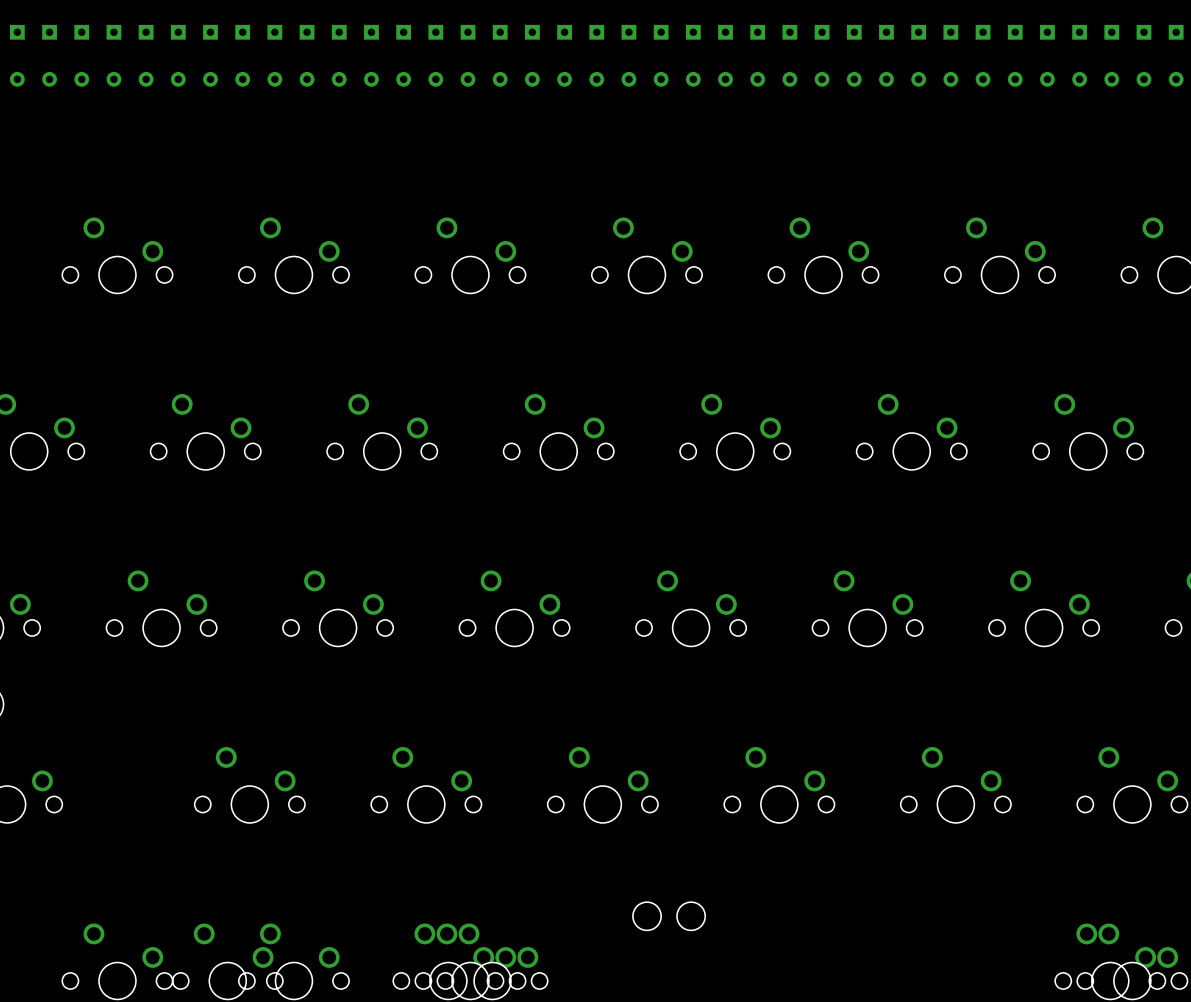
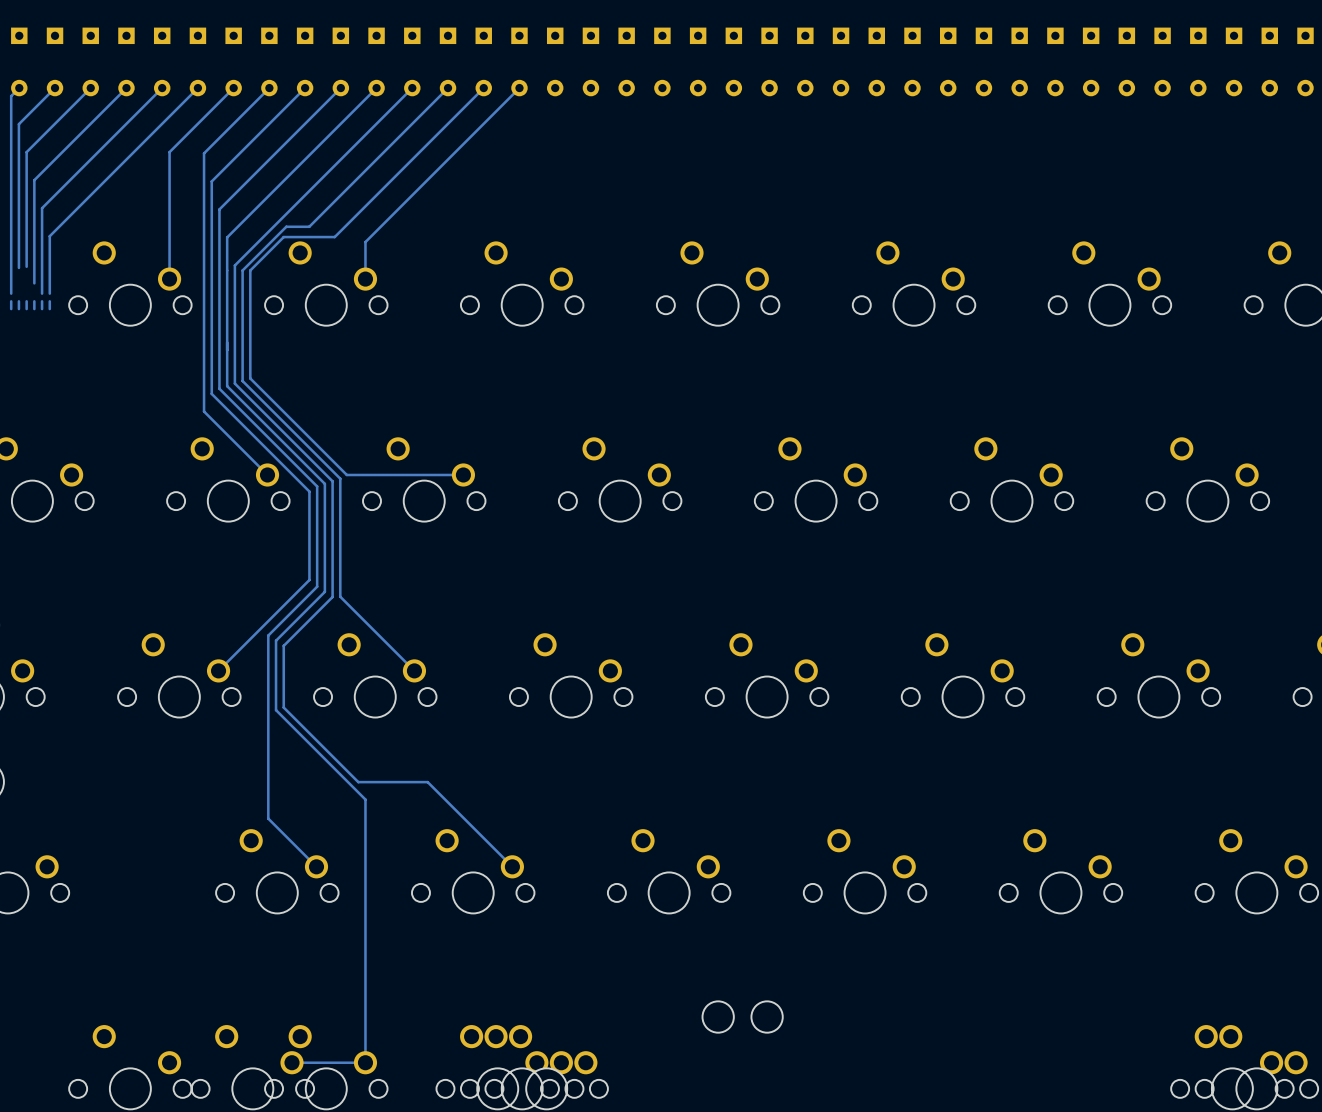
track: none -> (19, 88) (11, 96) (11, 293)
track: none -> (55, 88) (18, 124) (18, 267)
track: none -> (90, 88) (26, 152) (26, 266)
track: none -> (126, 88) (34, 180) (34, 283)
track: none -> (162, 88) (42, 208) (42, 293)
track: none -> (197, 88) (49, 236) (49, 293)
track: none -> (233, 88) (169, 152) (169, 279)
track: none -> (269, 88) (204, 153) (204, 411) (267, 474)
track: none -> (305, 88) (211, 181) (211, 393) (309, 491) (309, 579) (218, 670)
track: none -> (340, 88) (219, 209) (219, 388) (317, 486) (317, 586) (268, 635) (268, 818) (316, 866)
track: none -> (376, 88) (227, 237) (227, 386) (324, 483) (324, 591) (276, 640) (276, 710) (365, 799) (365, 1062) (292, 1062)
track: none -> (412, 88) (234, 265) (234, 383) (332, 481) (332, 597) (283, 645) (283, 707) (358, 782) (427, 782) (512, 866)
track: none -> (448, 88) (309, 226) (286, 226) (242, 270) (242, 381) (340, 478) (340, 596) (414, 670)
track: none -> (483, 88) (334, 237) (283, 237) (250, 270) (250, 378) (346, 474) (463, 474)
track: none -> (519, 88) (365, 242) (365, 279)
track: none -> (11, 301) (11, 309)
track: none -> (18, 301) (18, 309)
track: none -> (26, 301) (26, 309)
track: none -> (34, 301) (34, 309)
track: none -> (42, 301) (42, 309)
track: none -> (49, 301) (49, 309)

